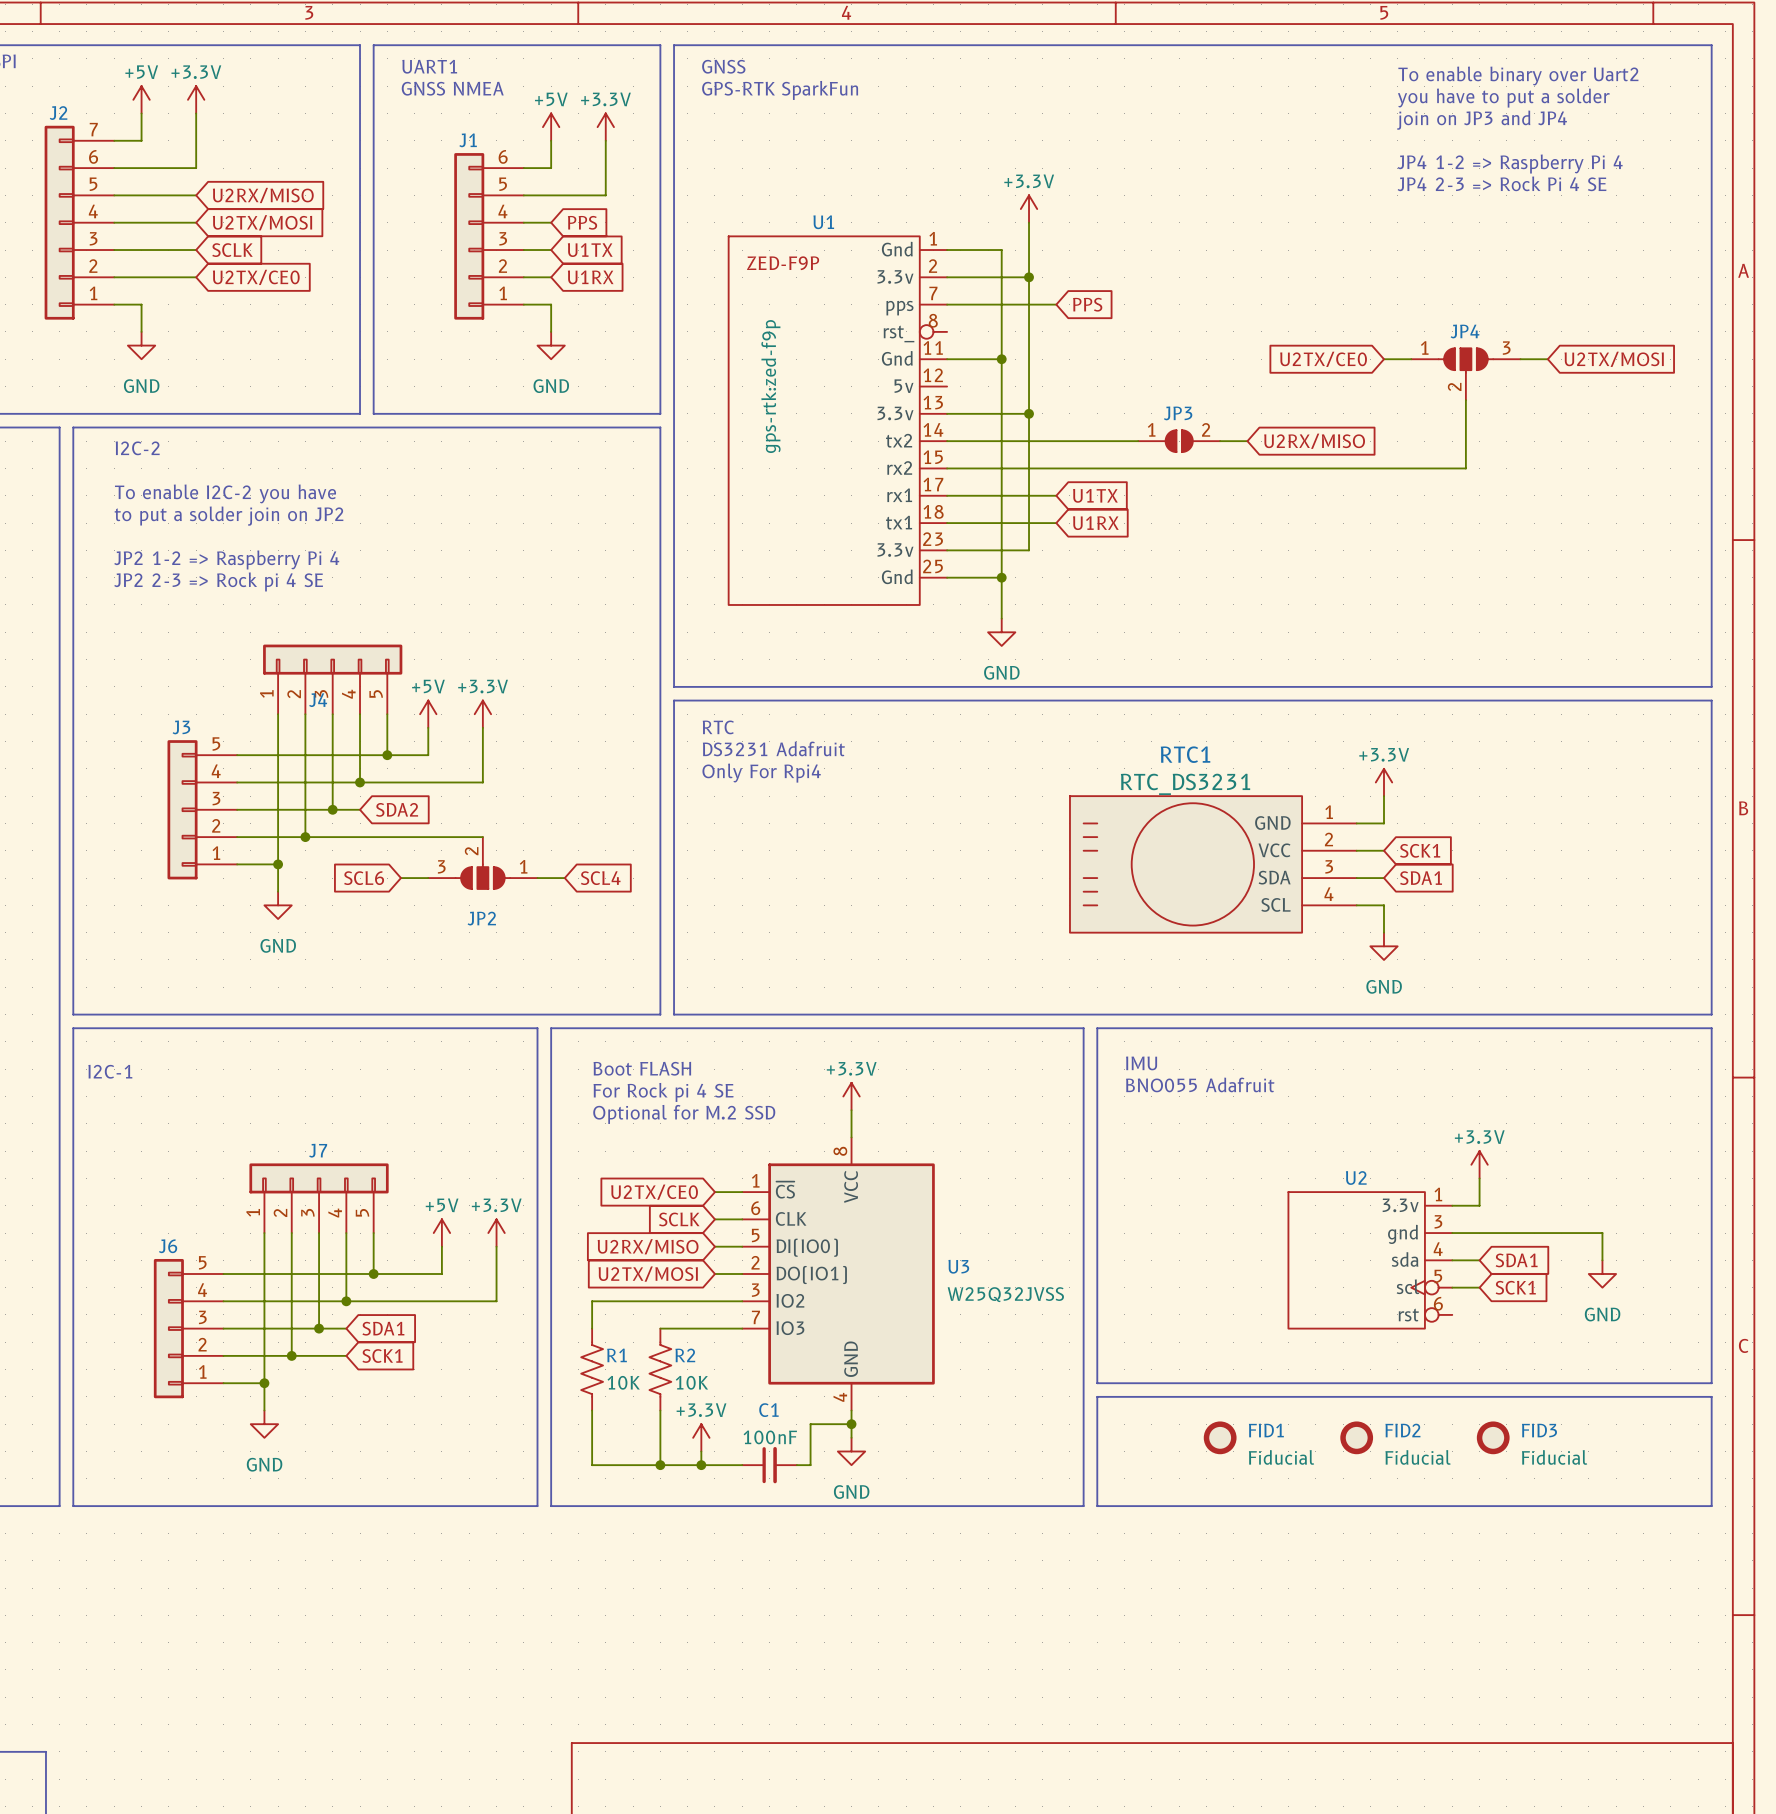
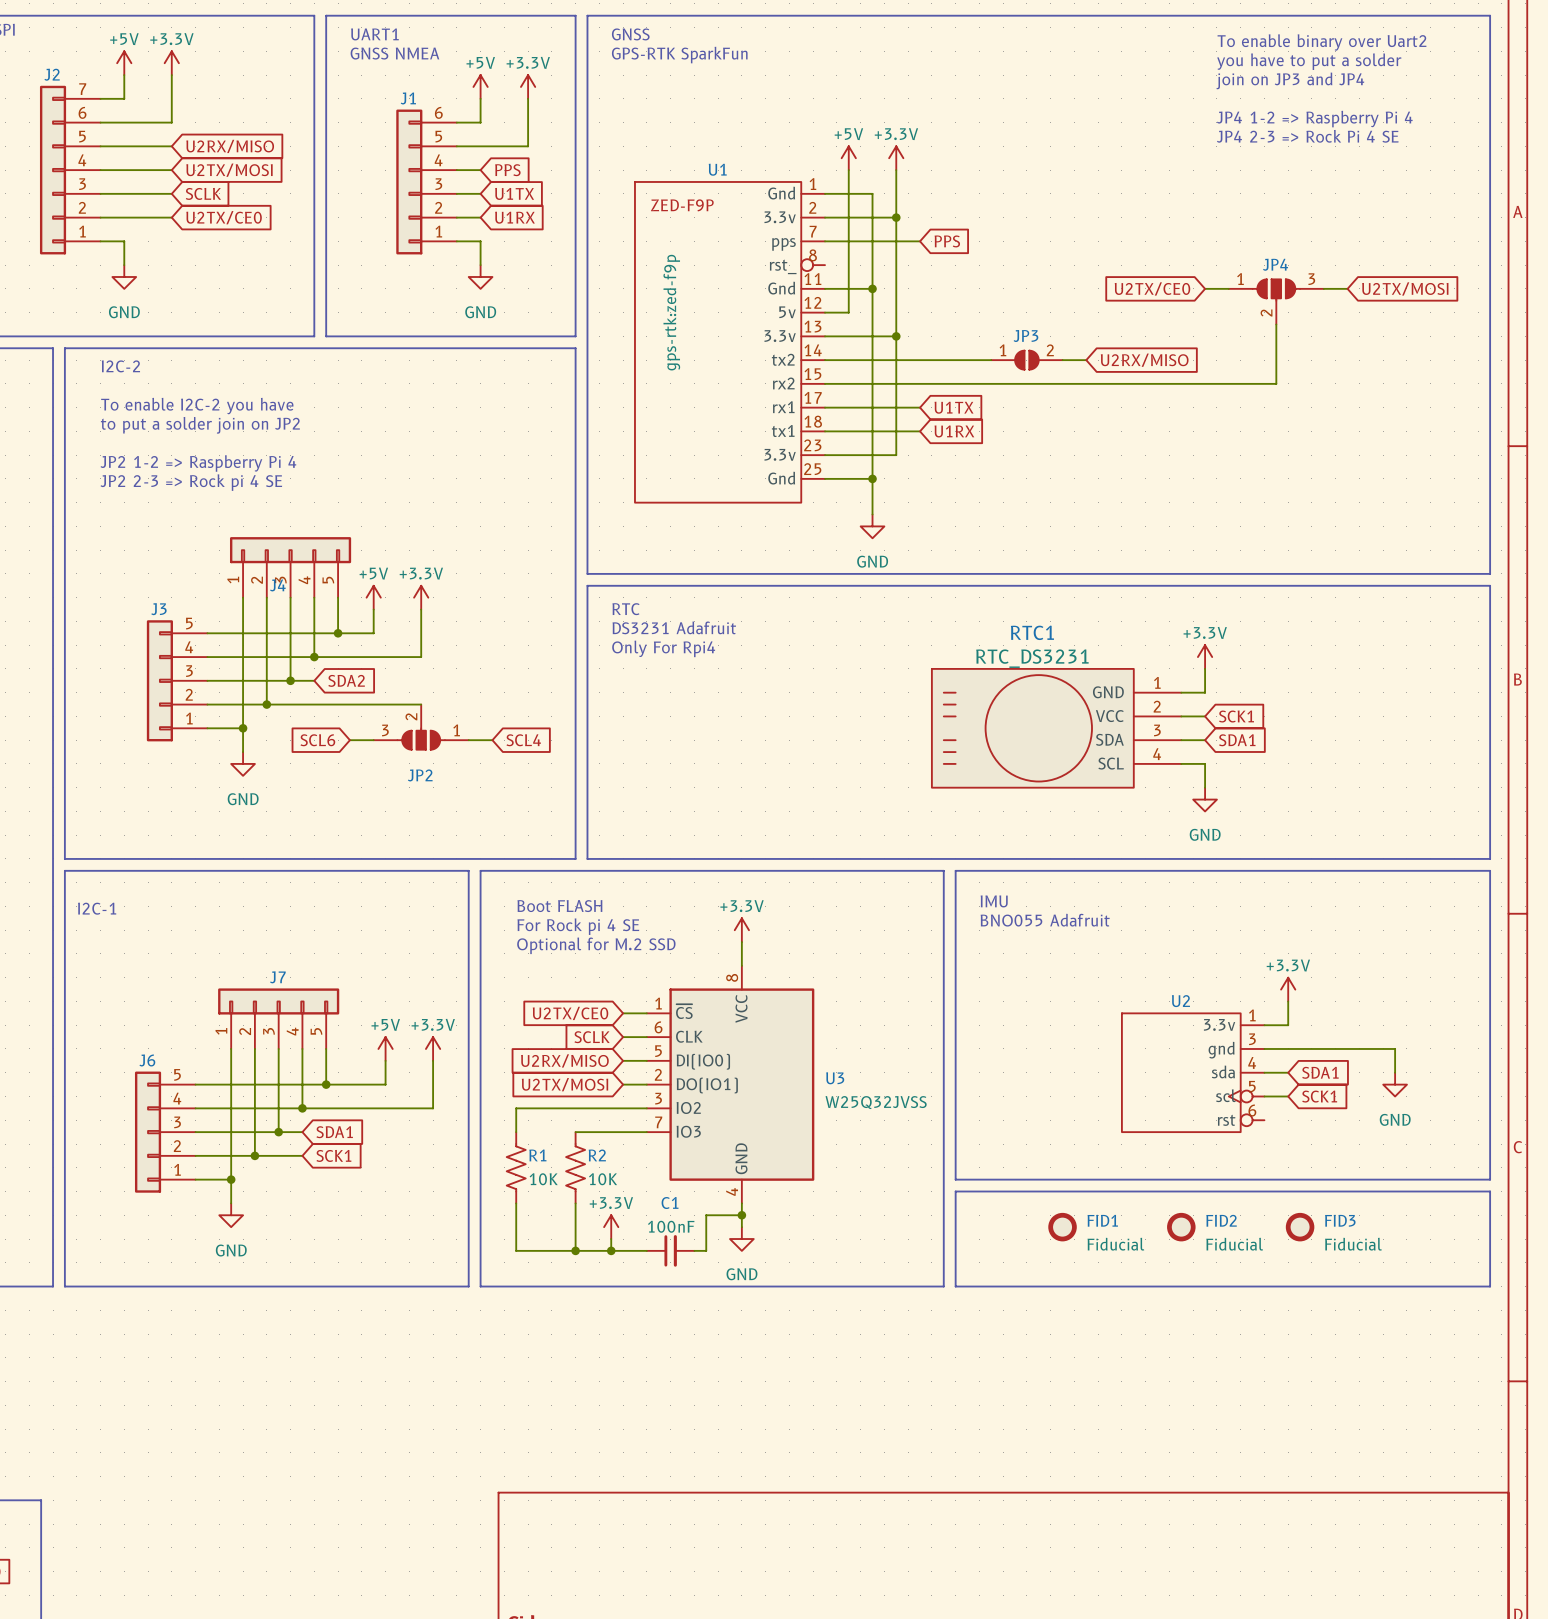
power symbol: none -> +5V (848, 158)
wire: none -> (848, 170) (848, 312) (825, 312)

